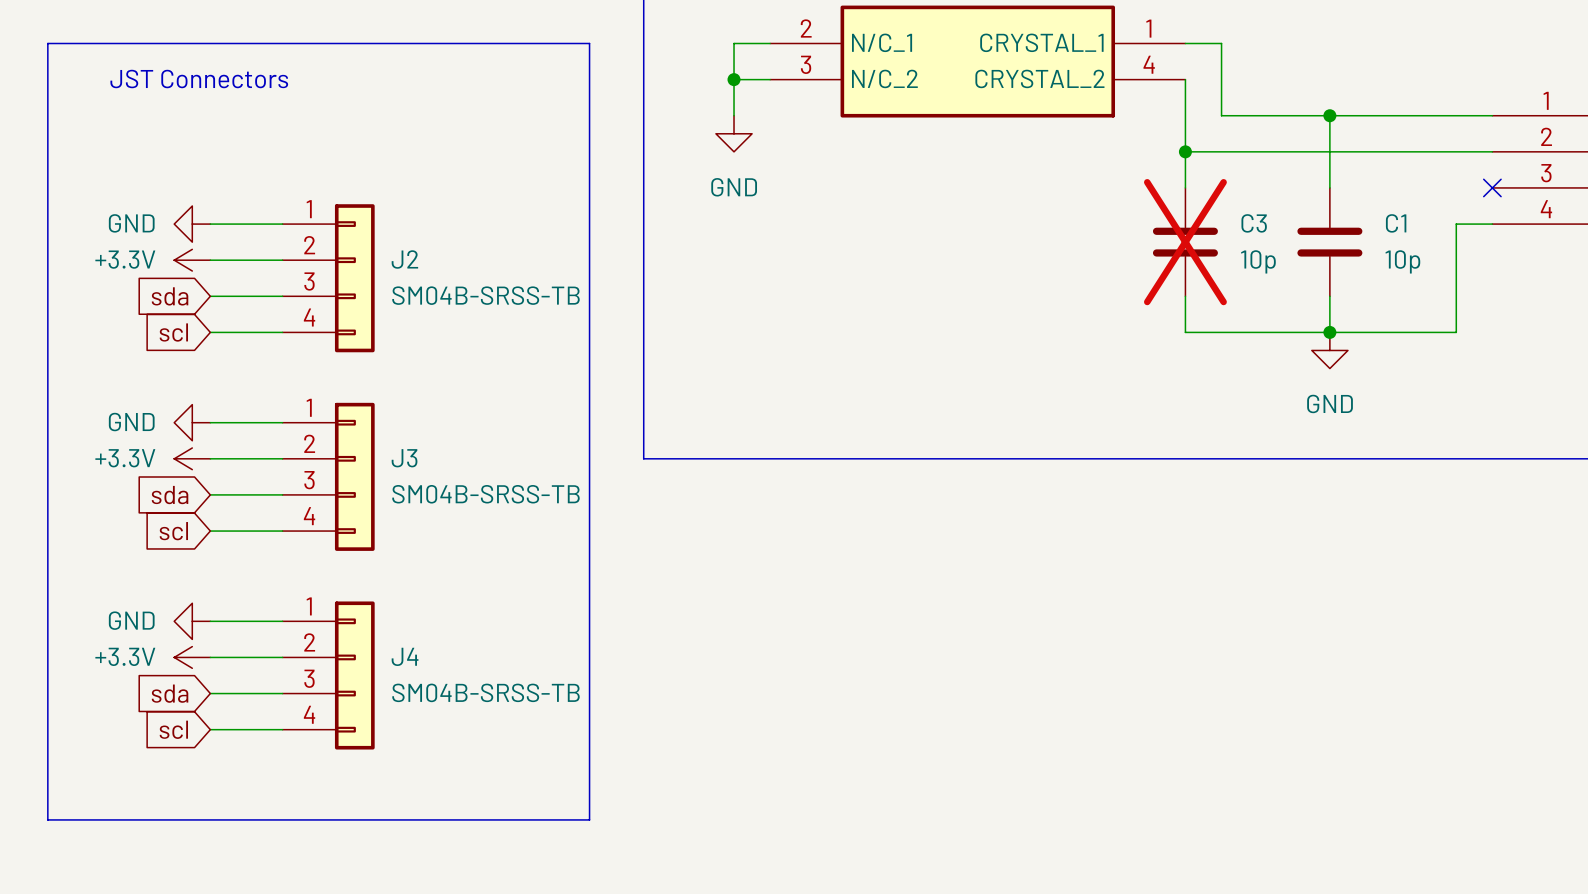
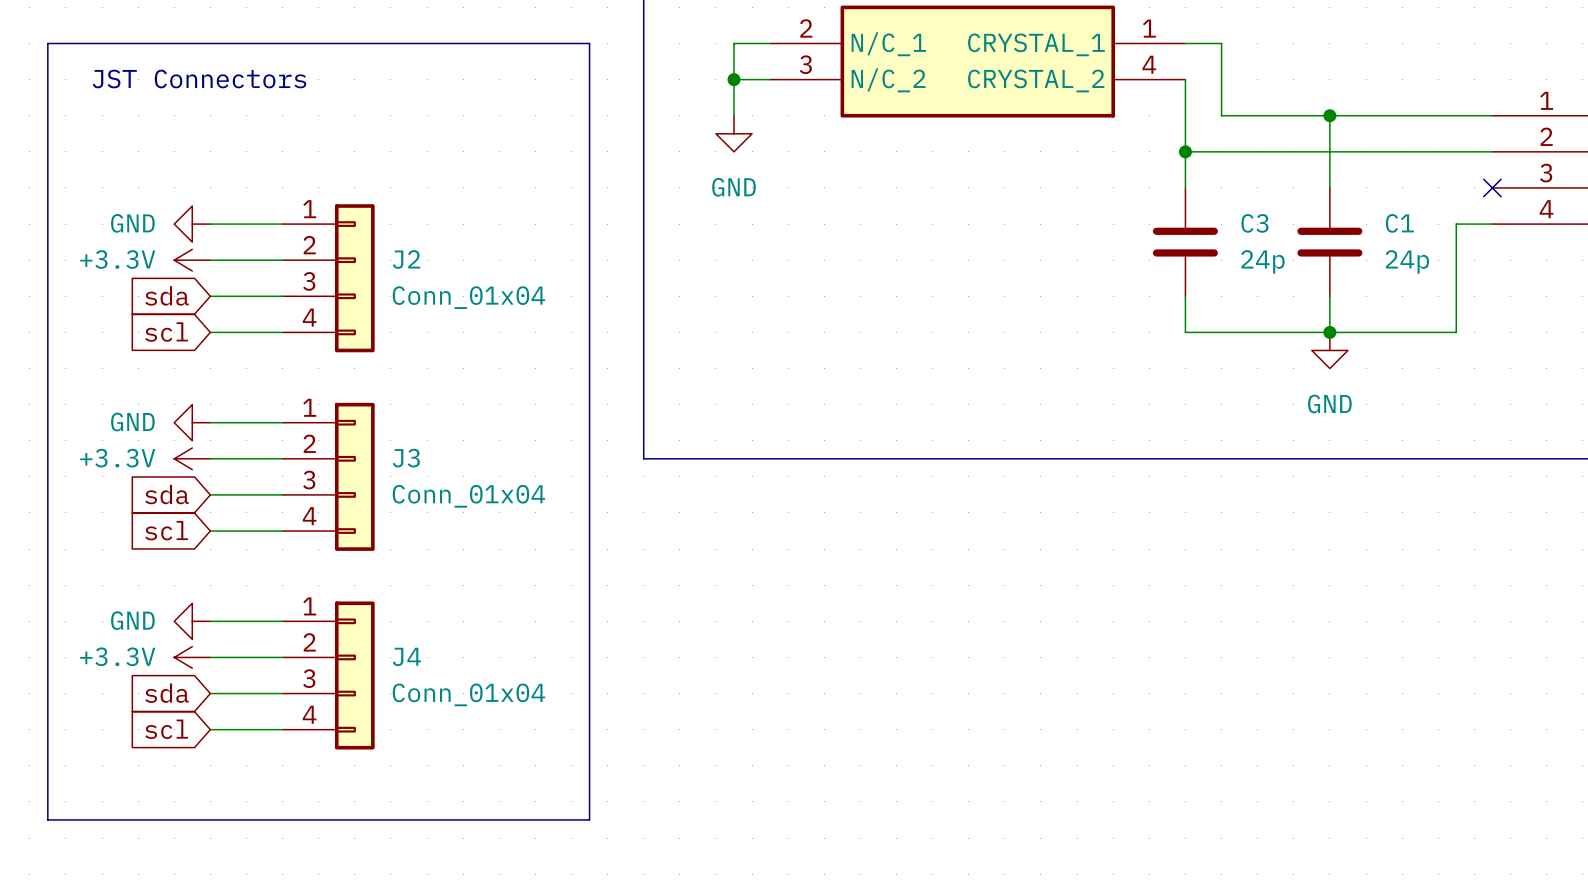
C3 do-not-place cross: (1185, 242) -> none
C3 value: 10p (1258, 261) -> 24p (1262, 261)
C1 value: 10p (1402, 261) -> 24p (1407, 261)
J2 value: SM04B-SRSS-TB (485, 295) -> Conn_01x04 (468, 297)
J3 value: SM04B-SRSS-TB (485, 494) -> Conn_01x04 (468, 496)
J4 value: SM04B-SRSS-TB (485, 692) -> Conn_01x04 (468, 694)

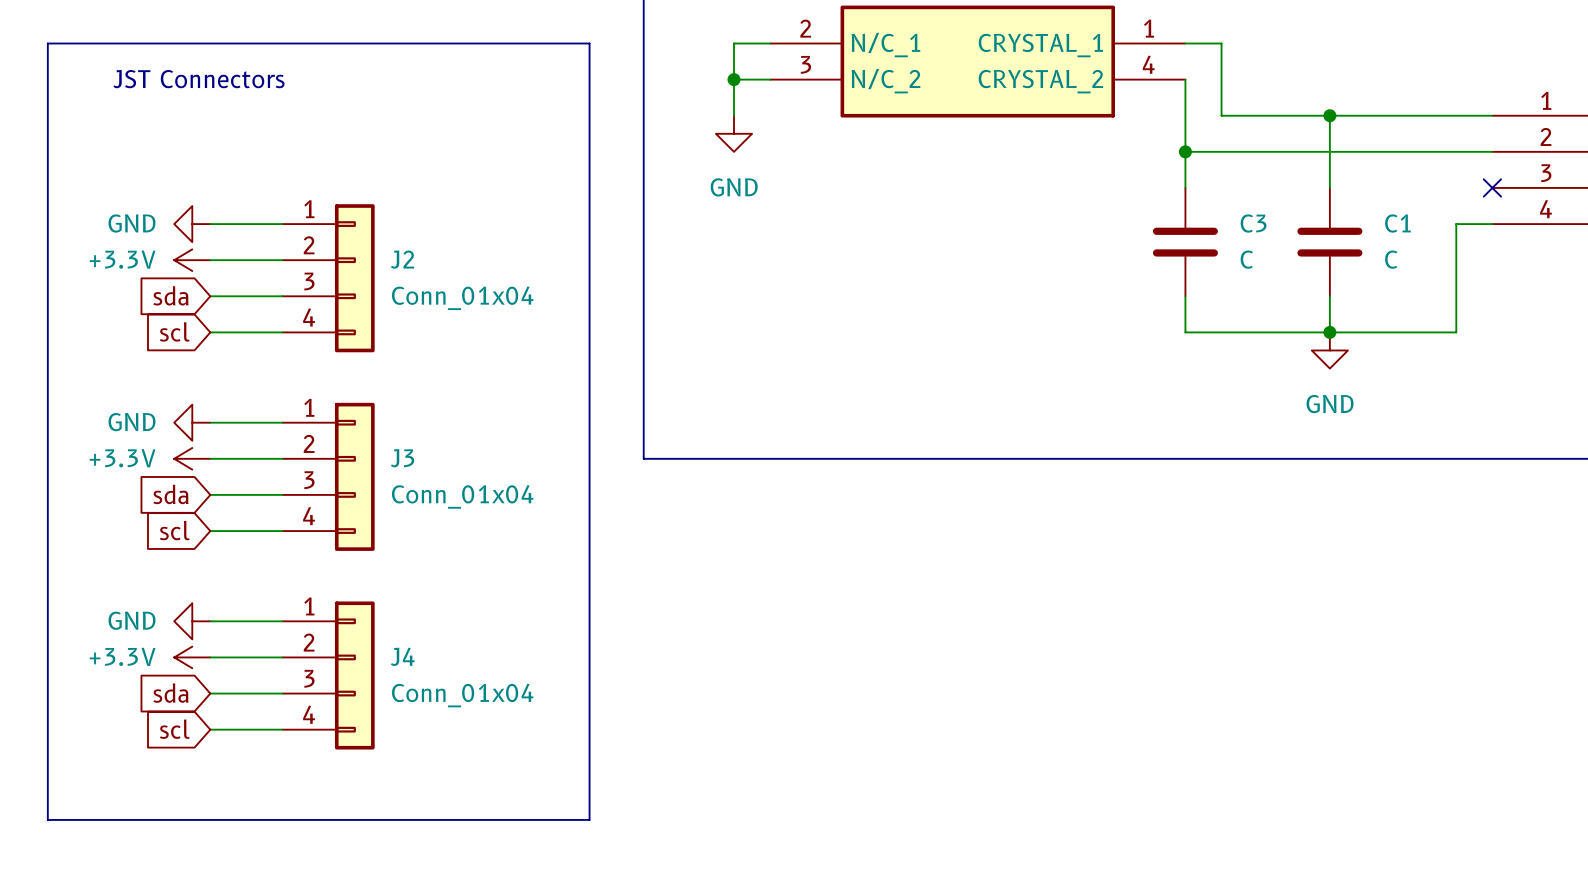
C3 value: 24p (1262, 261) -> C (1246, 259)
C1 value: 24p (1407, 261) -> C (1391, 259)

